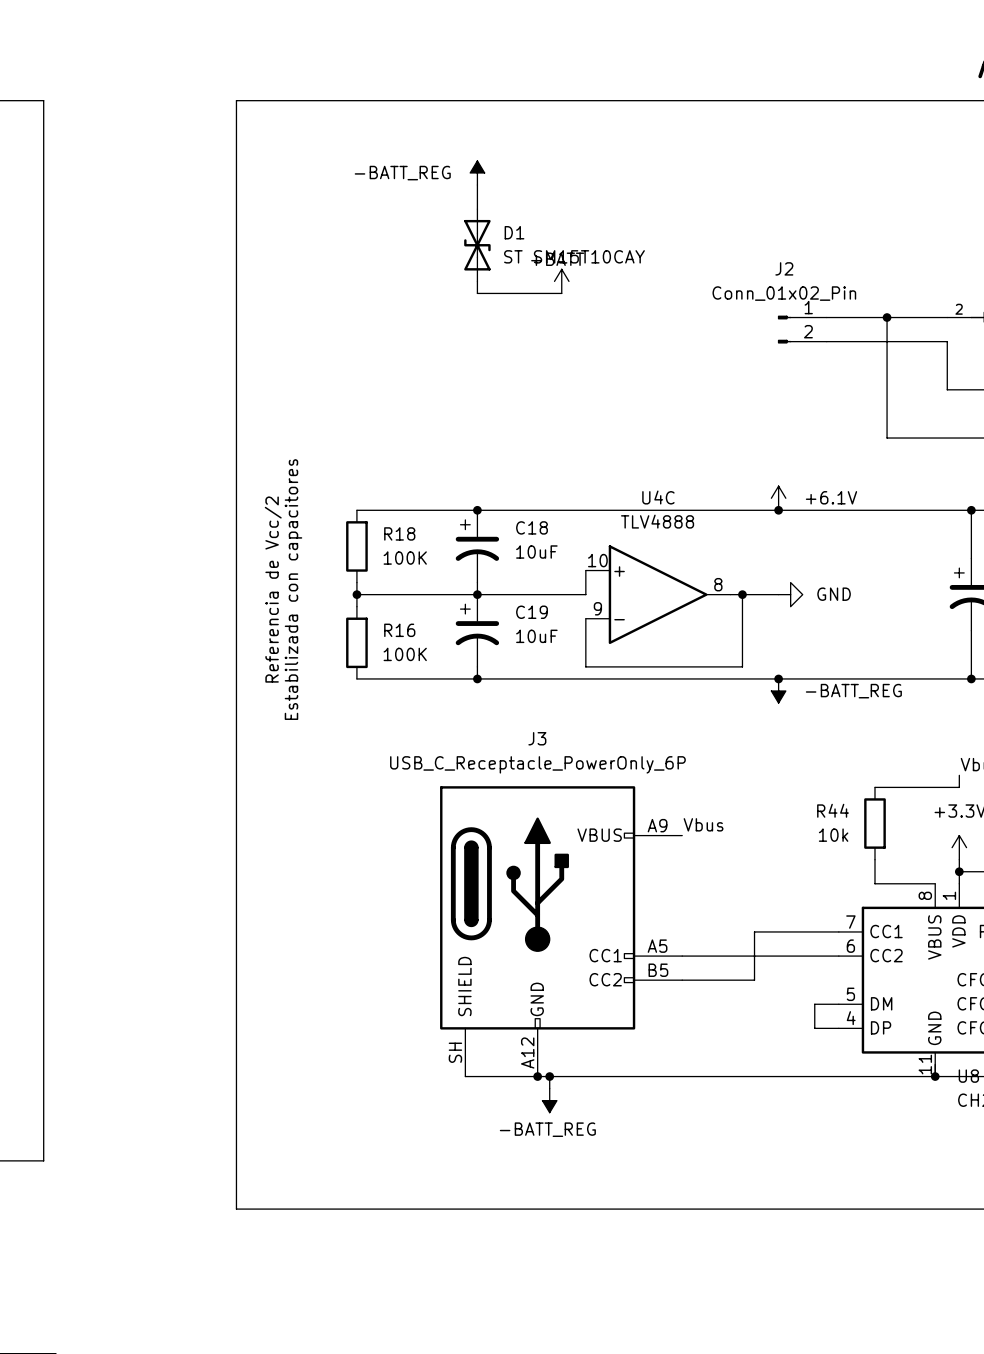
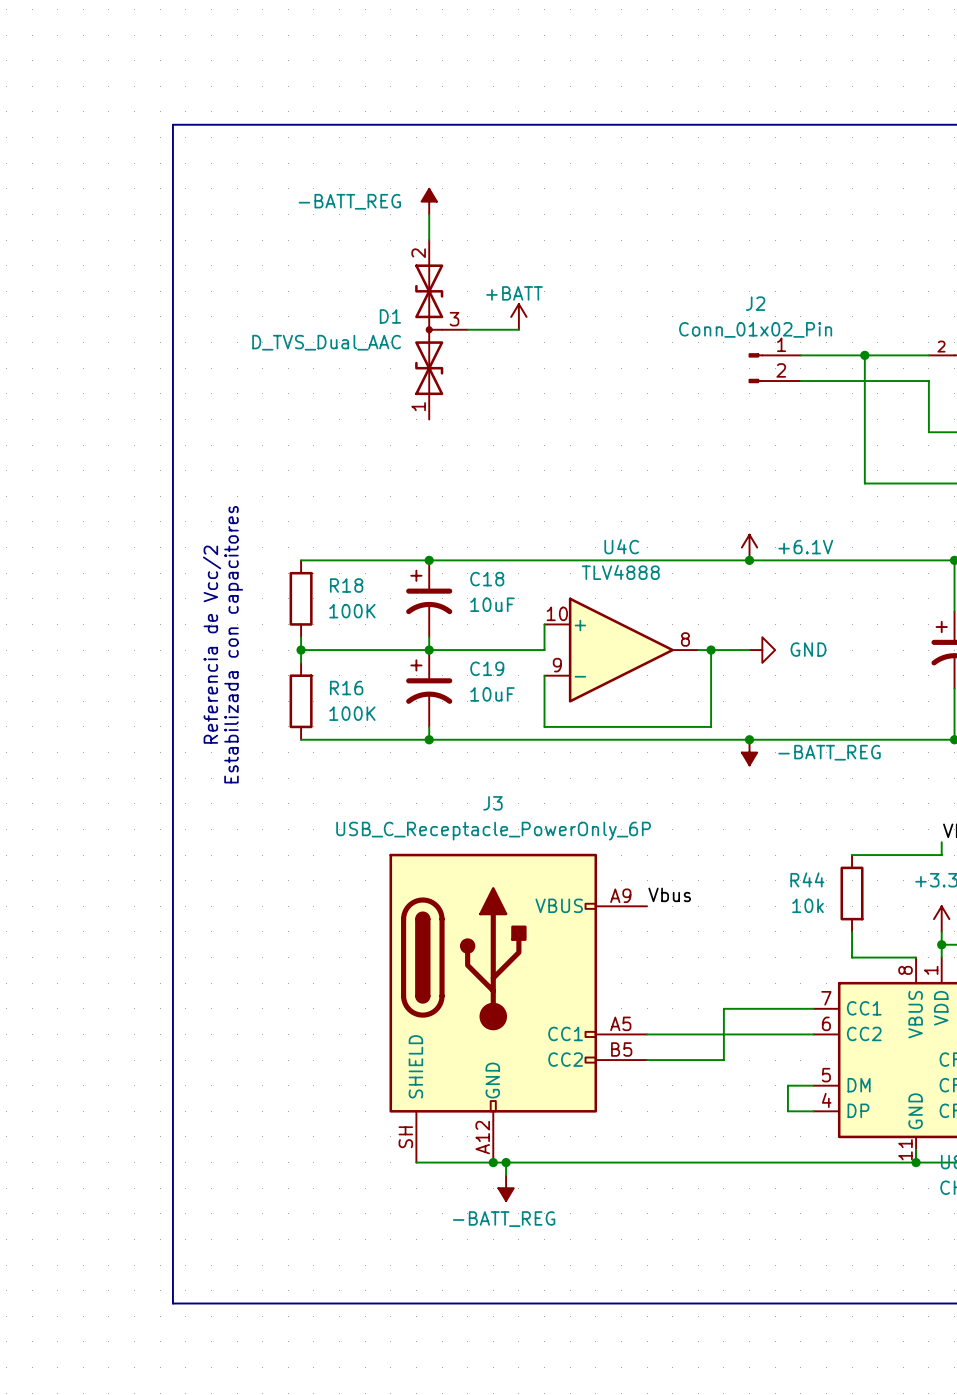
D1 symbol: [464, 209, 491, 282] -> [415, 240, 468, 420]
D1 name position: D1 (514, 232) -> D1 (390, 316)
D1 value: ST SM15T10CAY (574, 256) -> D_TVS_Dual_AAC (326, 342)

